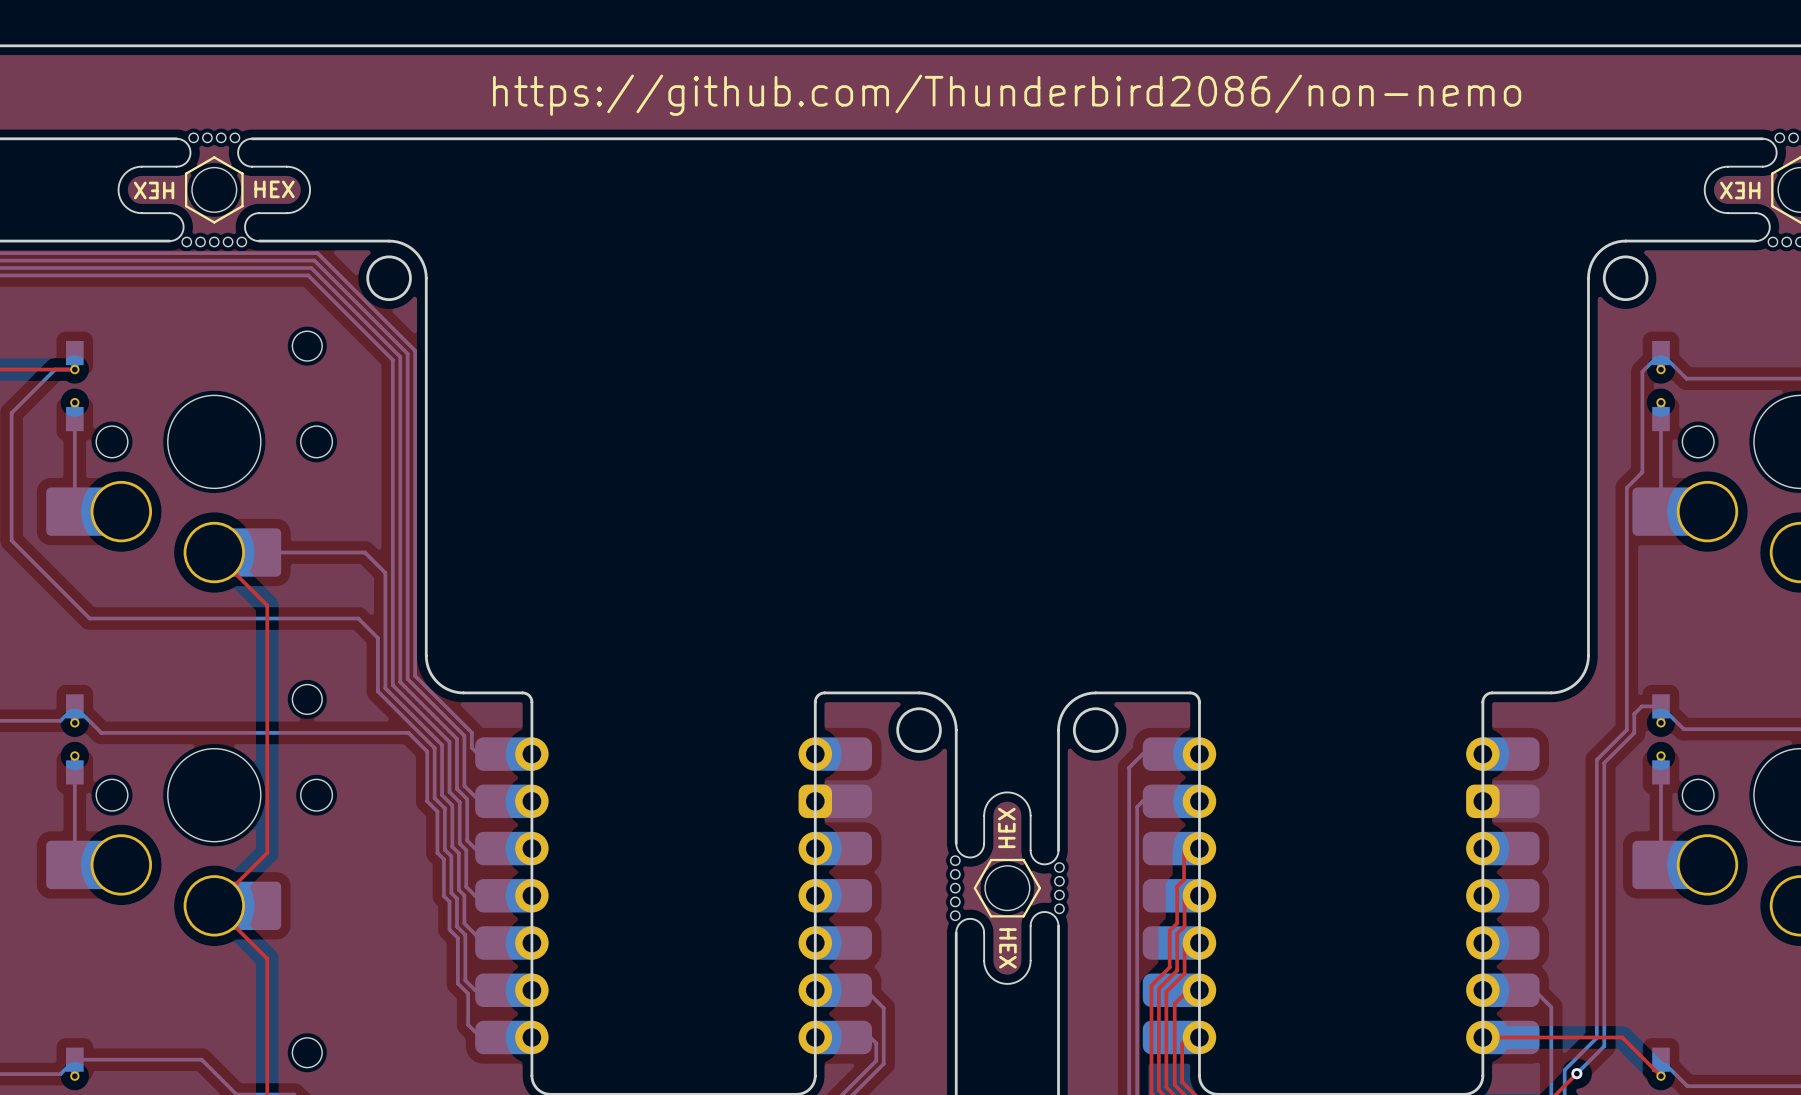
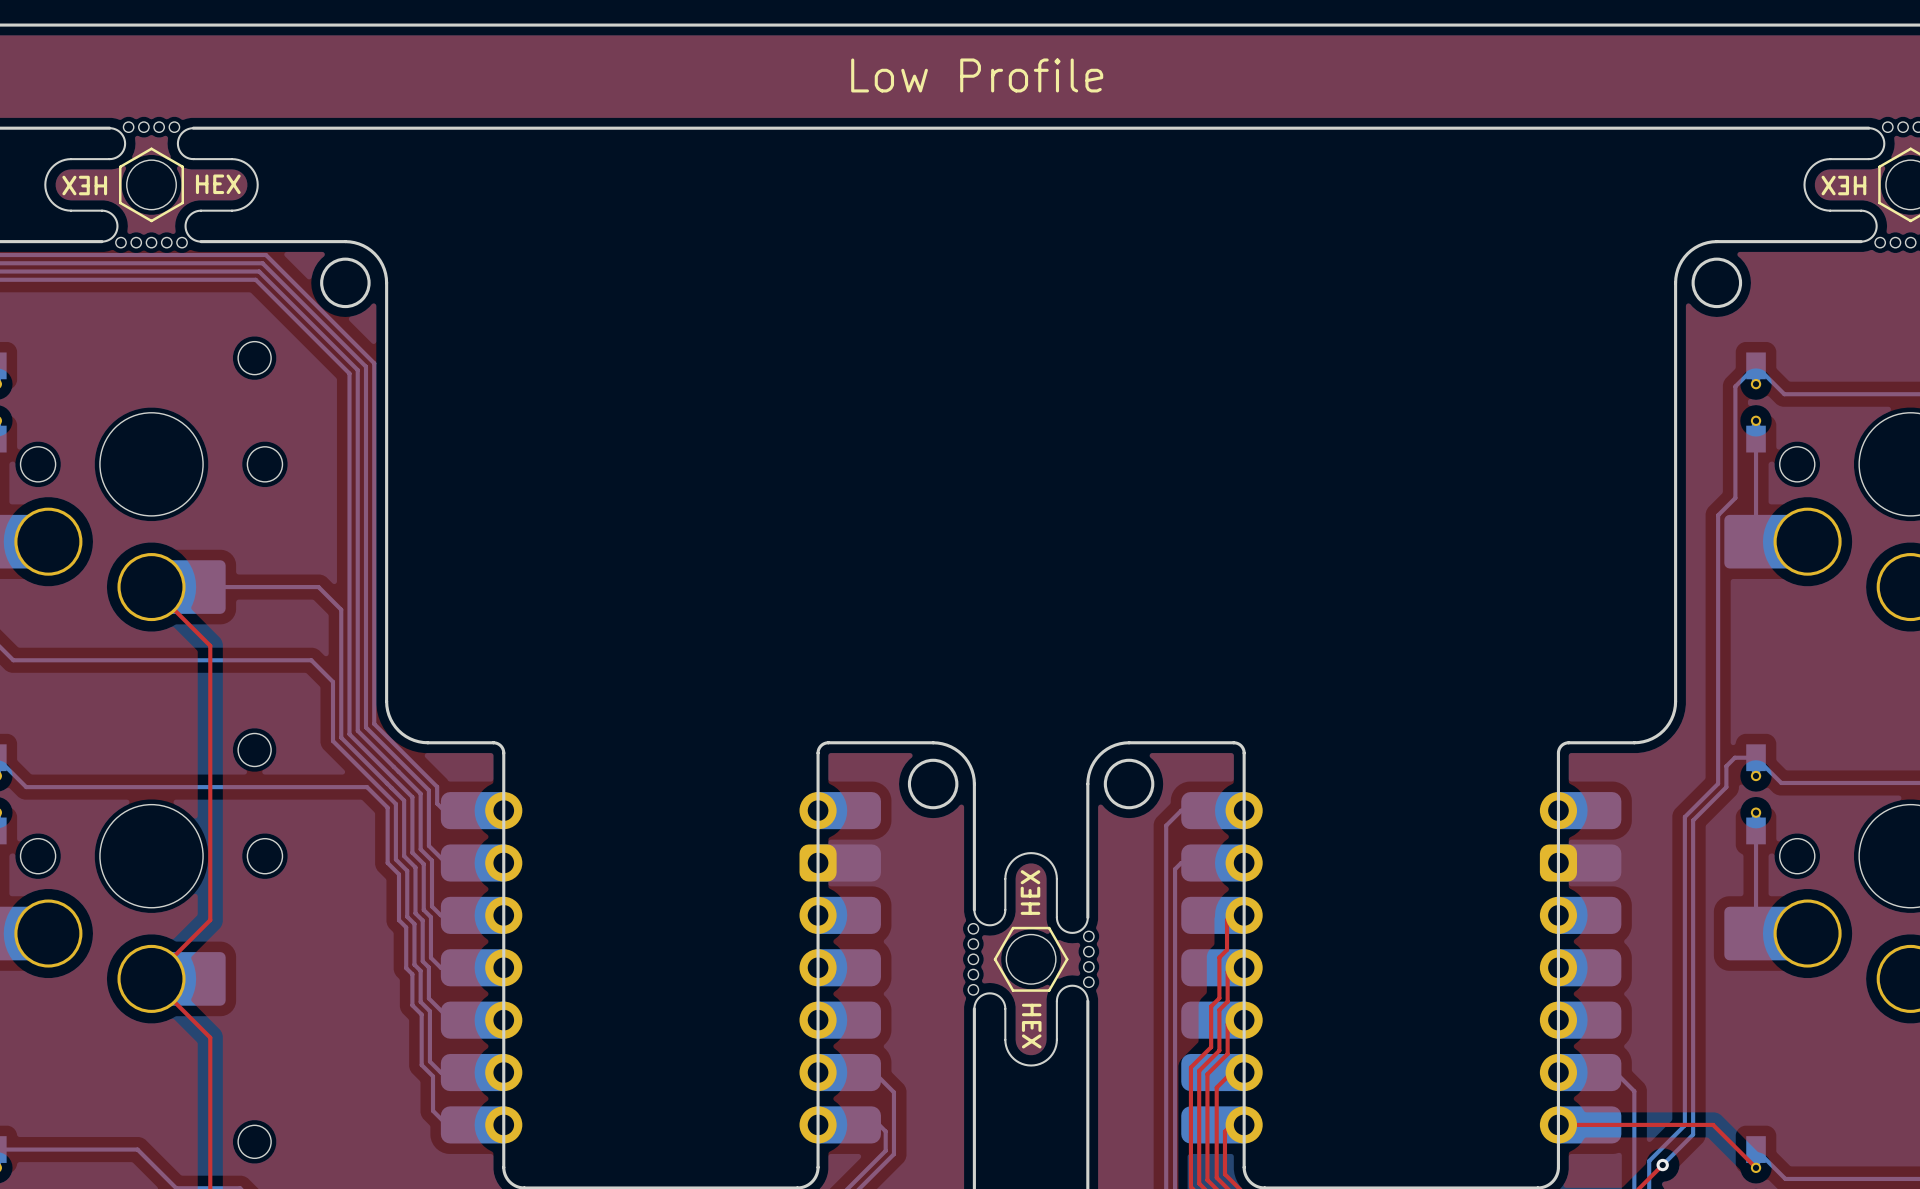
text: none -> Low Profile (977, 75)
text: https://github.com/Thunderbird2086/non-nemo (1007, 95) -> none

